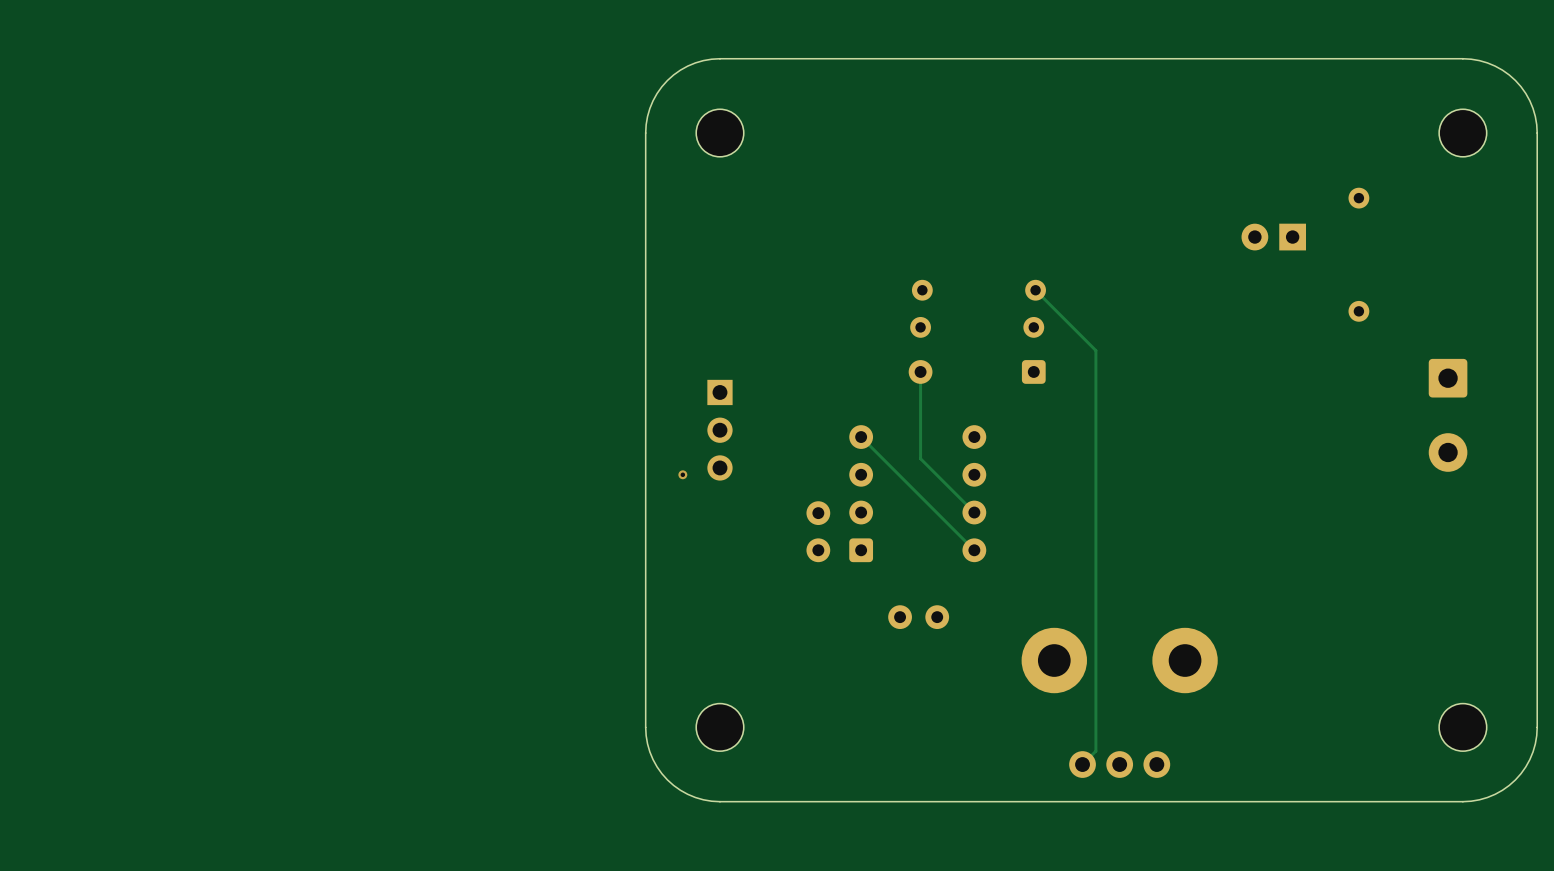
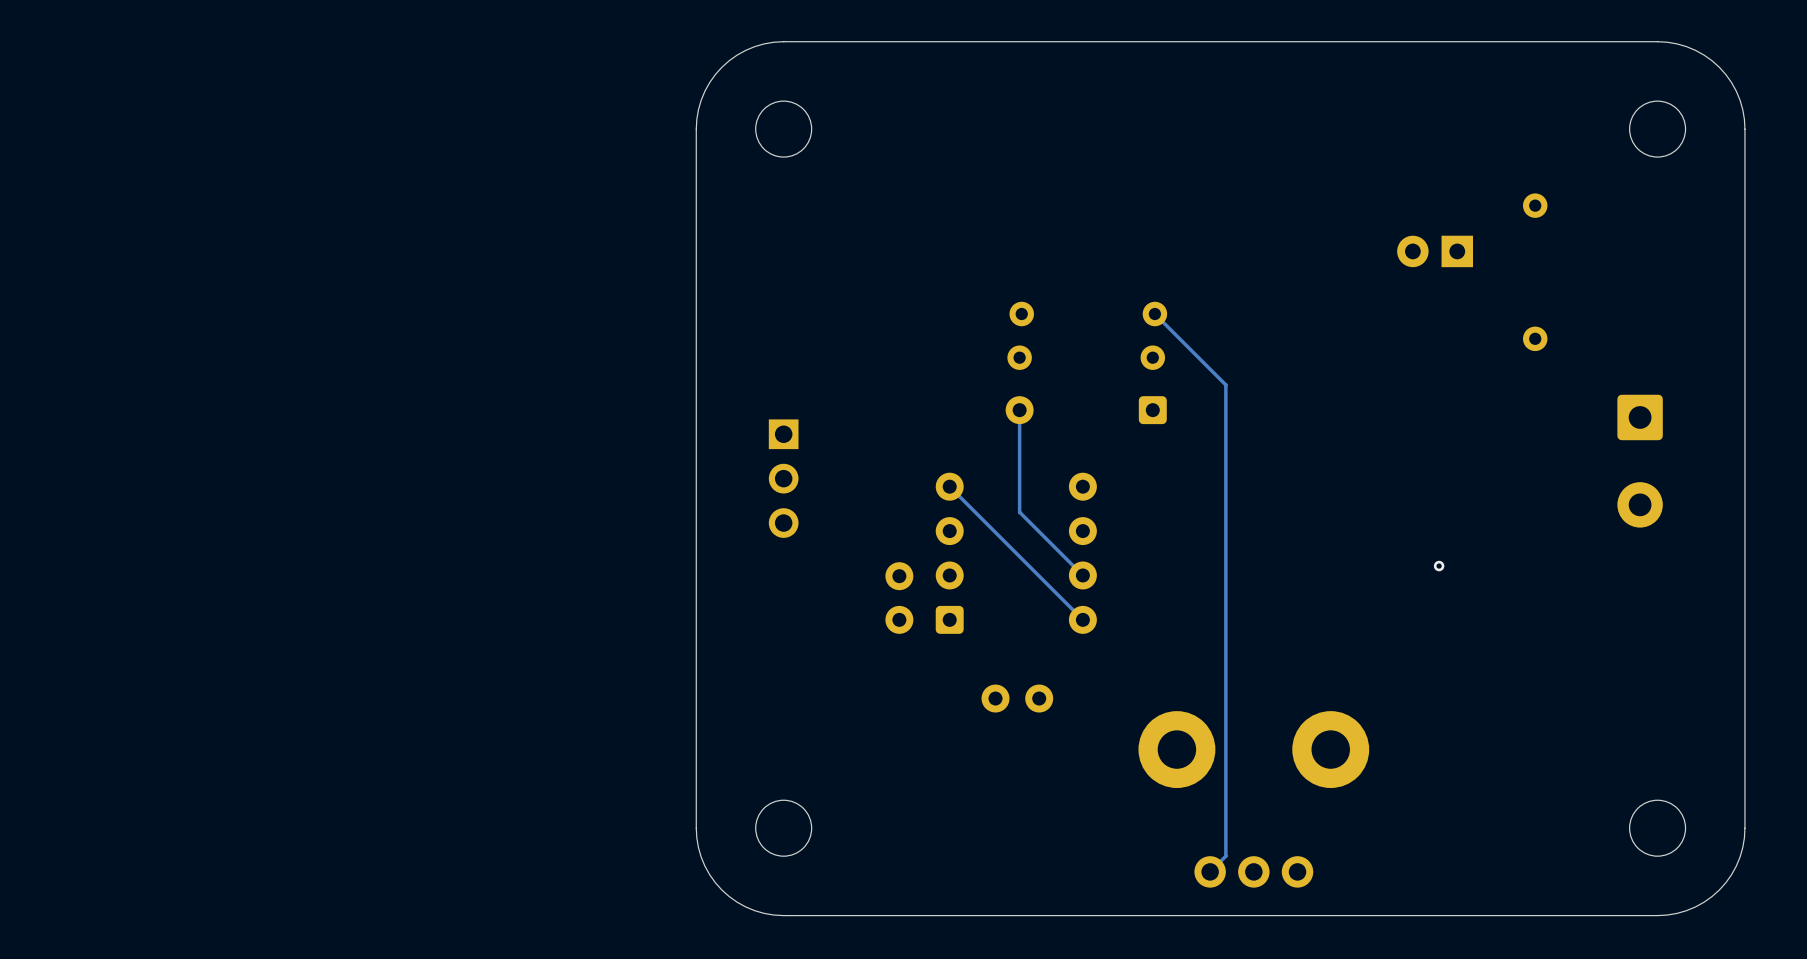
via: (682, 474) -> none
via: none -> (1439, 566)

